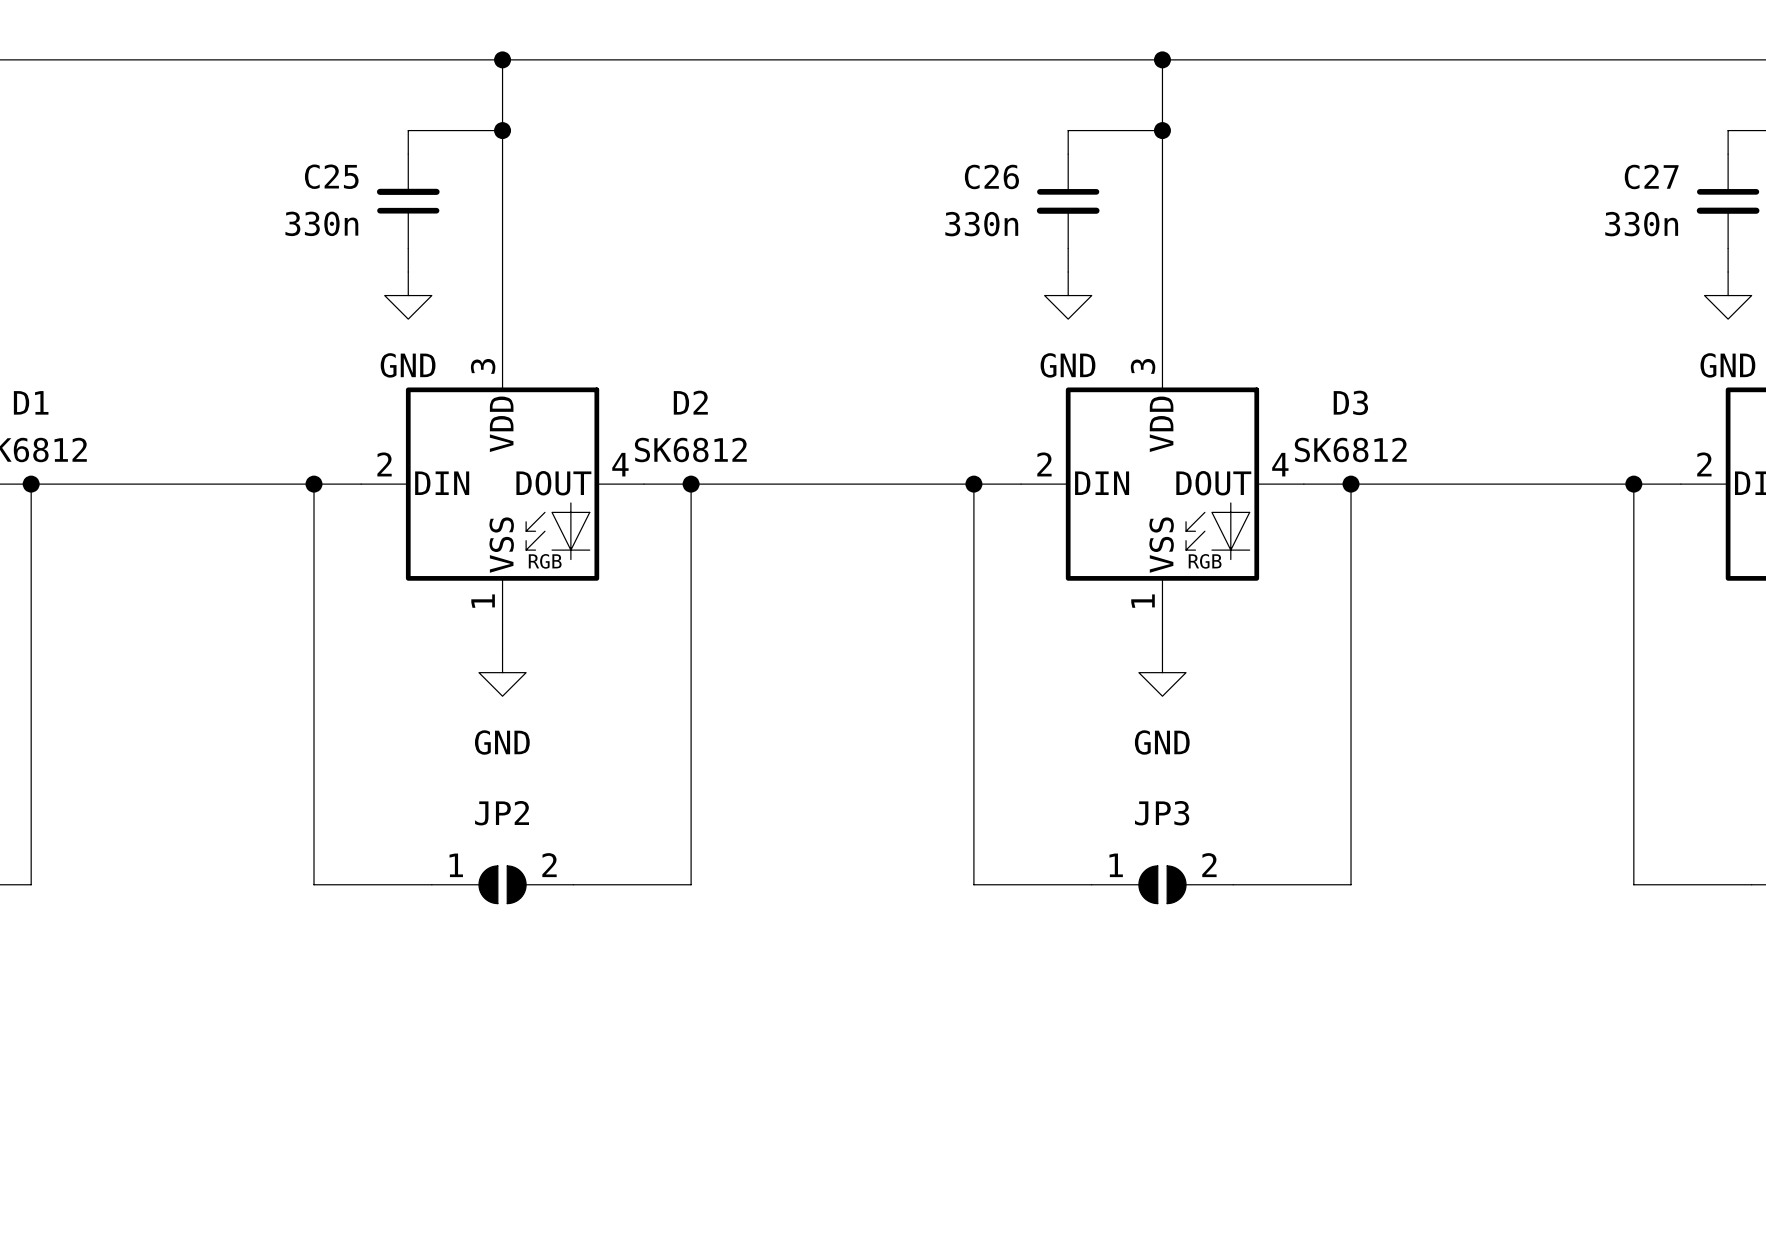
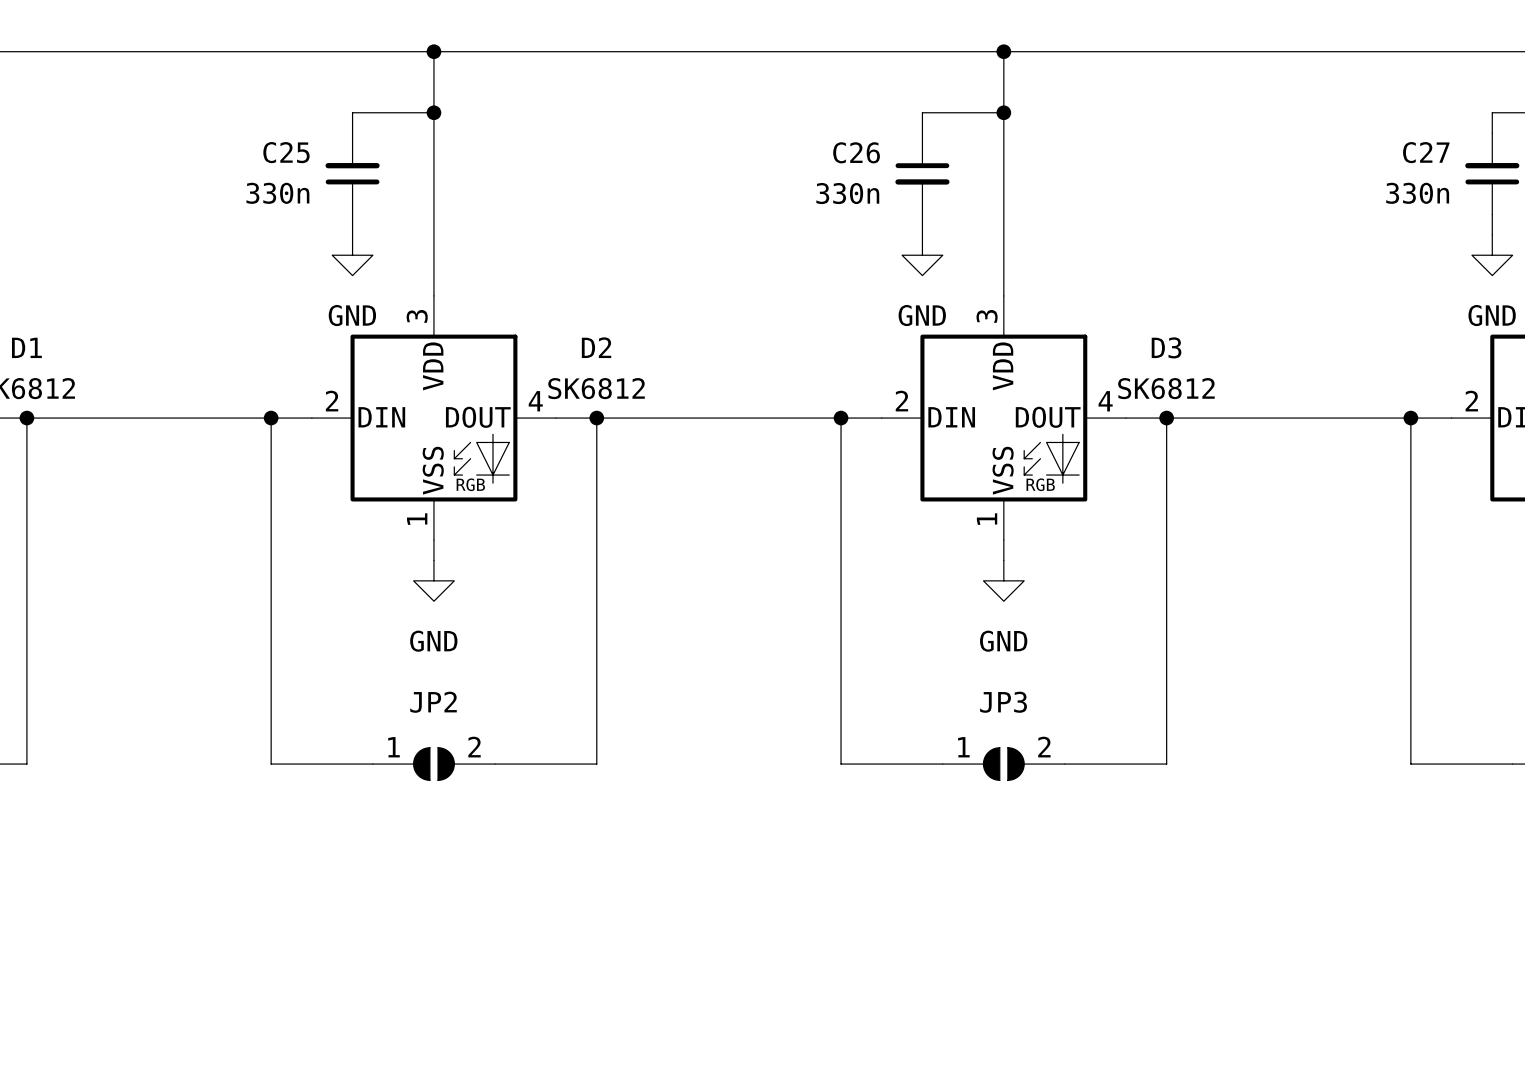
C27 rotation: 0° (1728, 201) -> 180° (1492, 173)

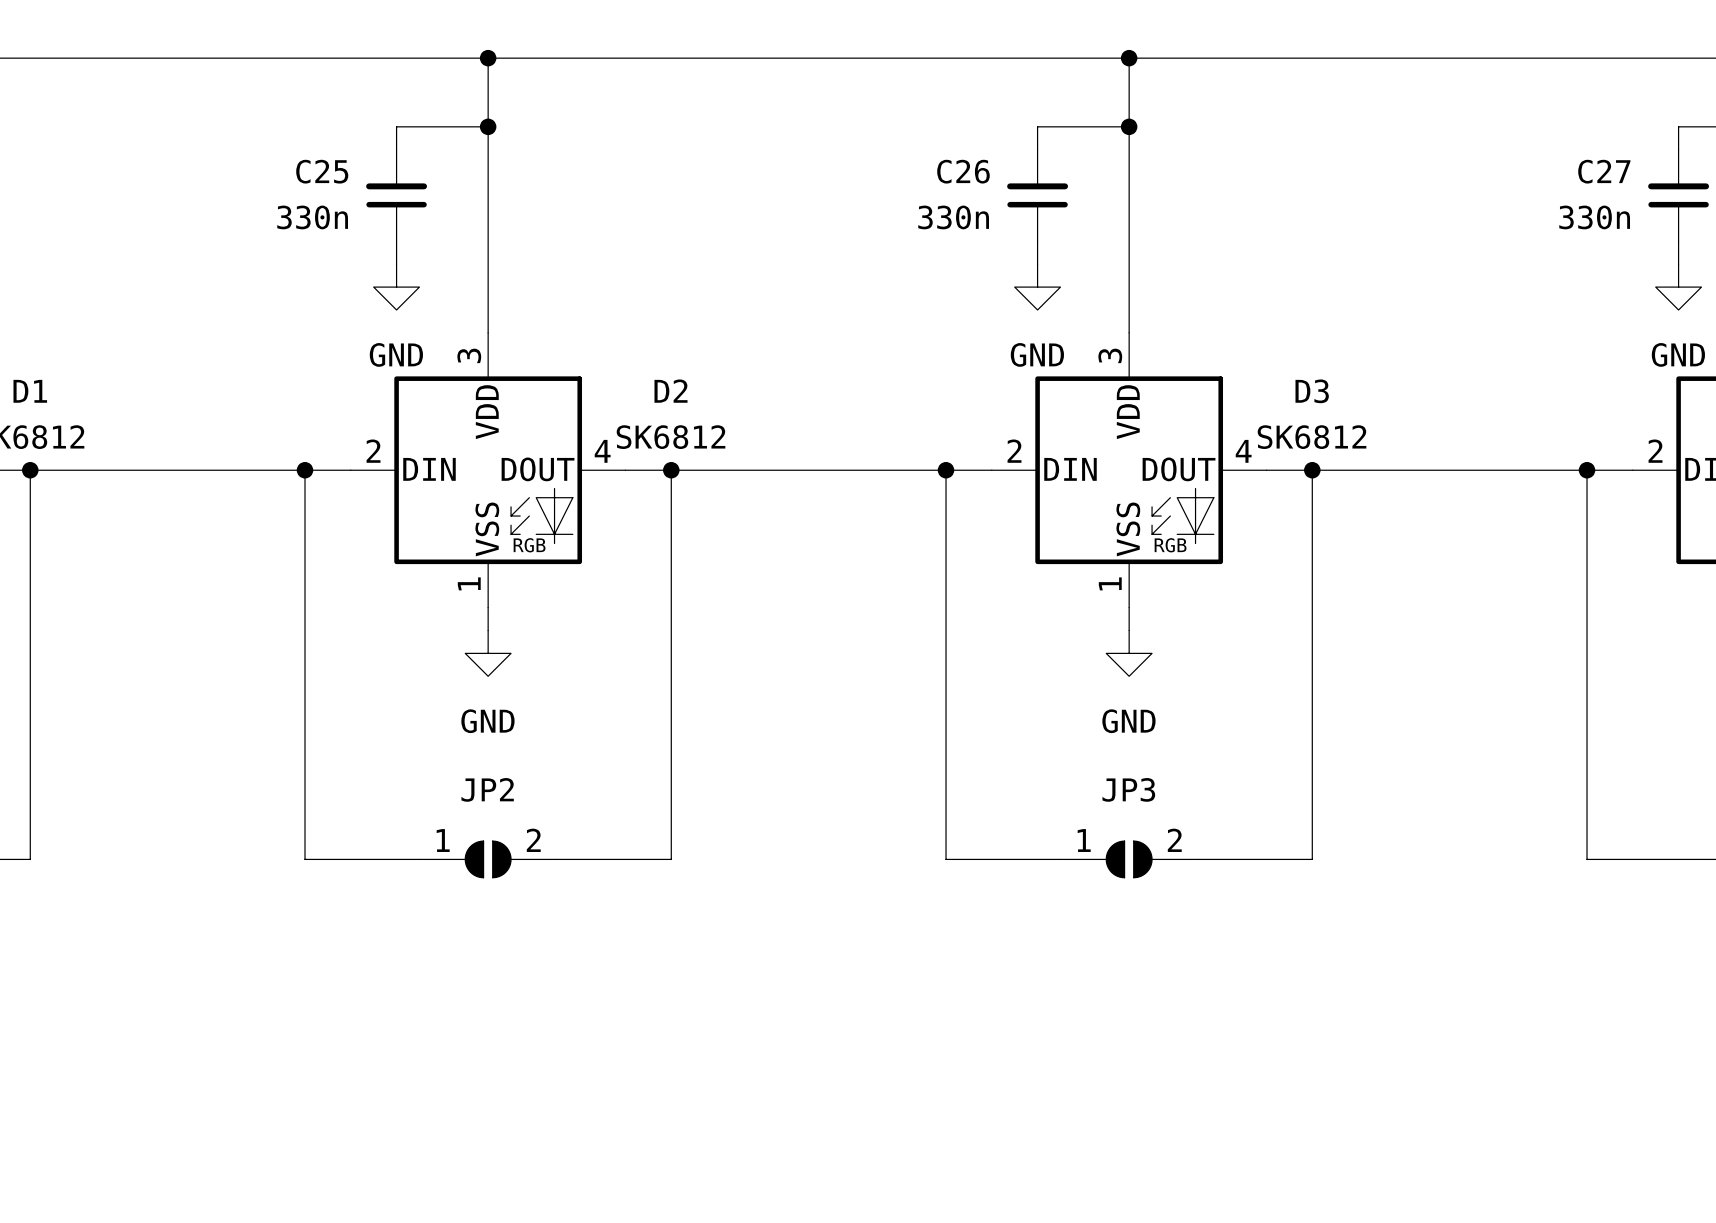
C26 rotation: 0° (922, 173) -> 180° (1037, 195)

